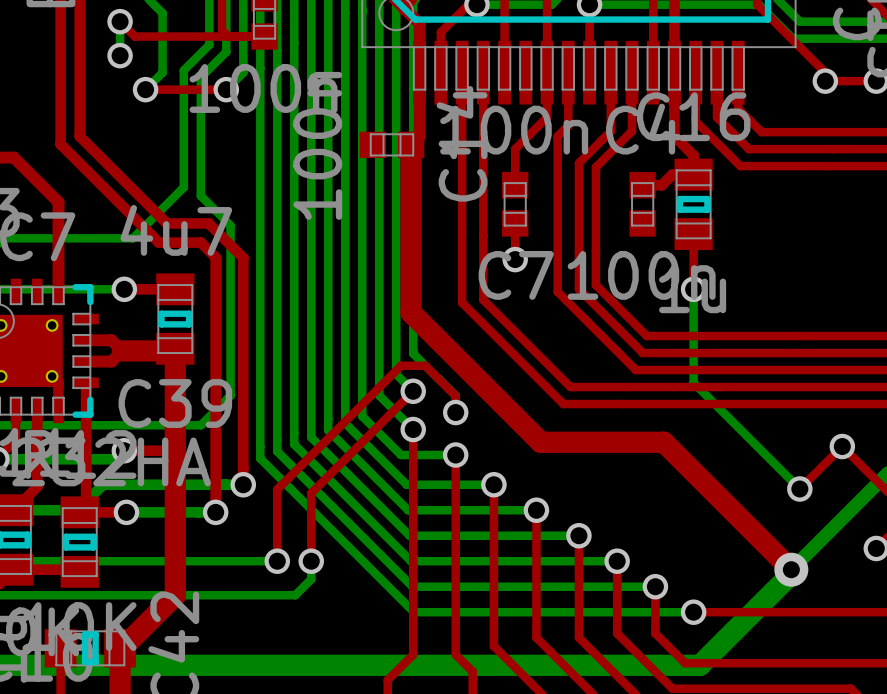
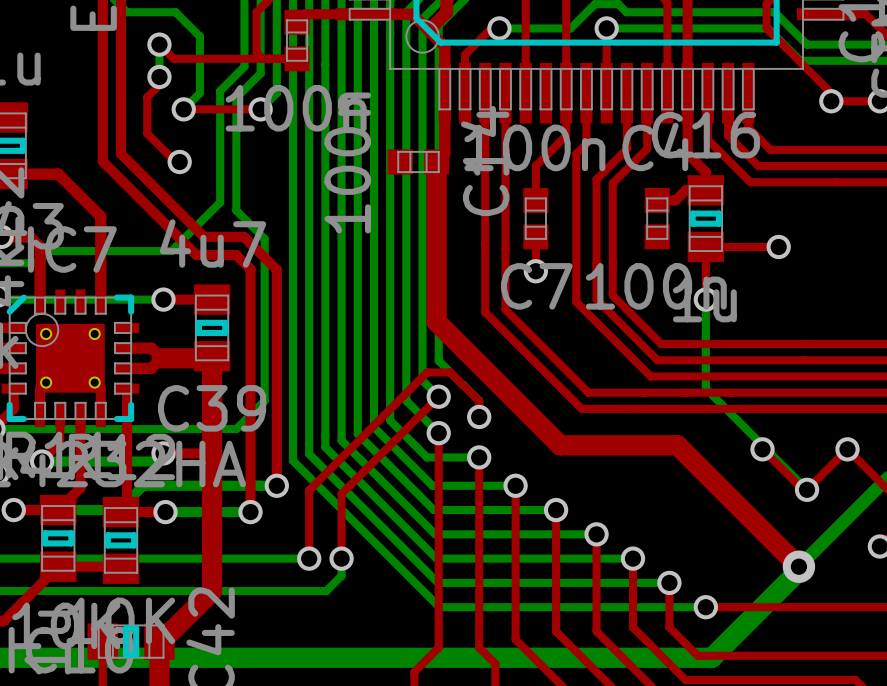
top track: none -> (159, 76) (159, 85) (147, 97) (147, 133) (175, 161) (179, 161)
via: none -> (179, 161)
top track: none -> (705, 246) (778, 246)
via: none -> (778, 246)
top track: none -> (762, 449) (802, 489) (807, 489)
via: none -> (762, 449)

